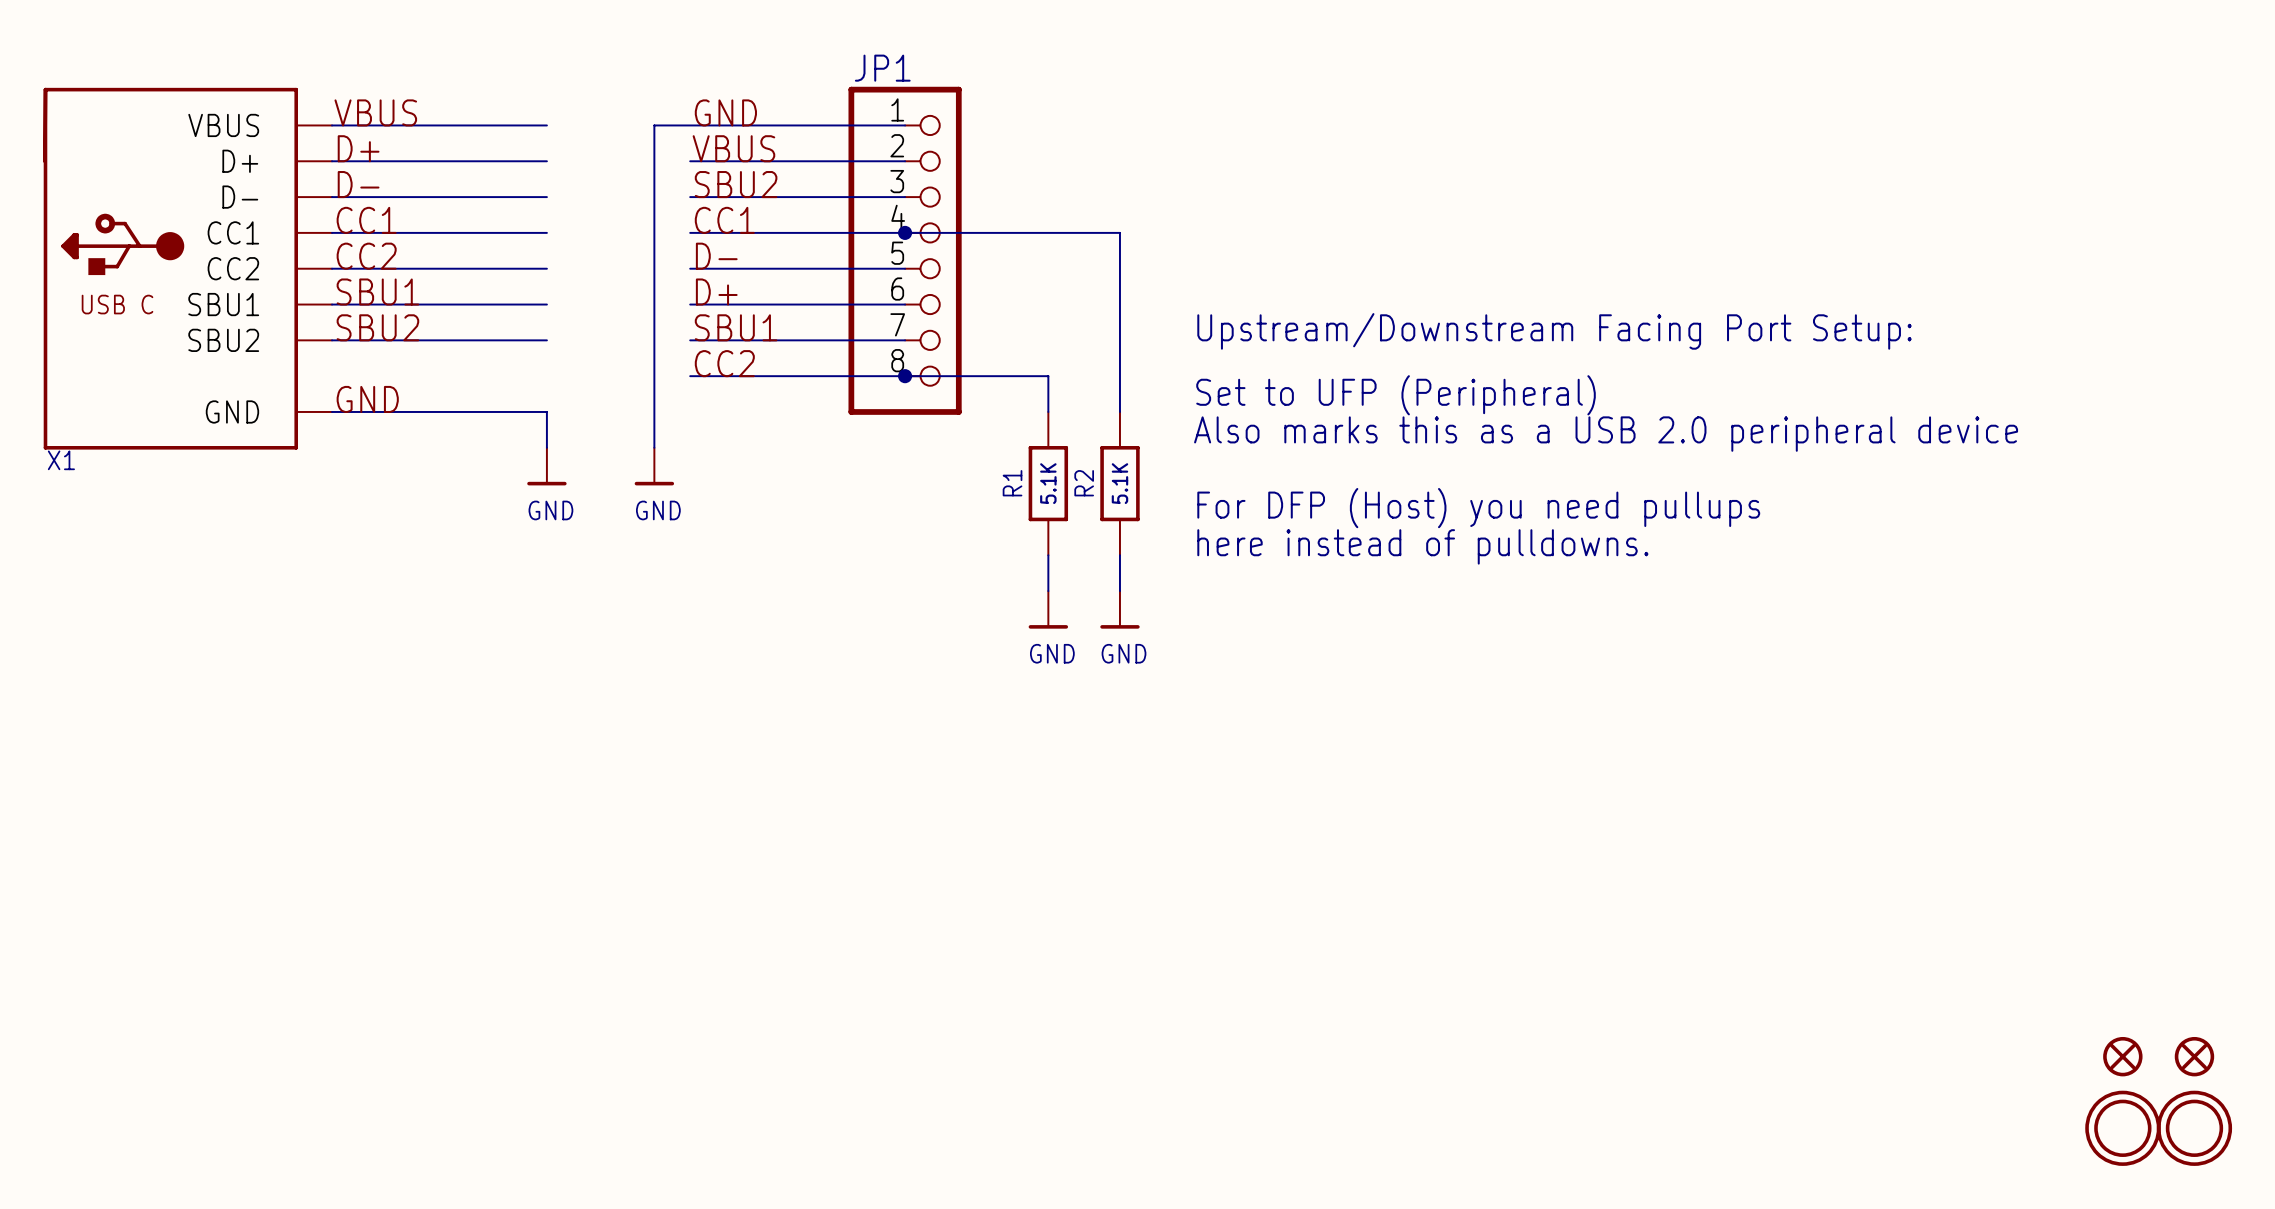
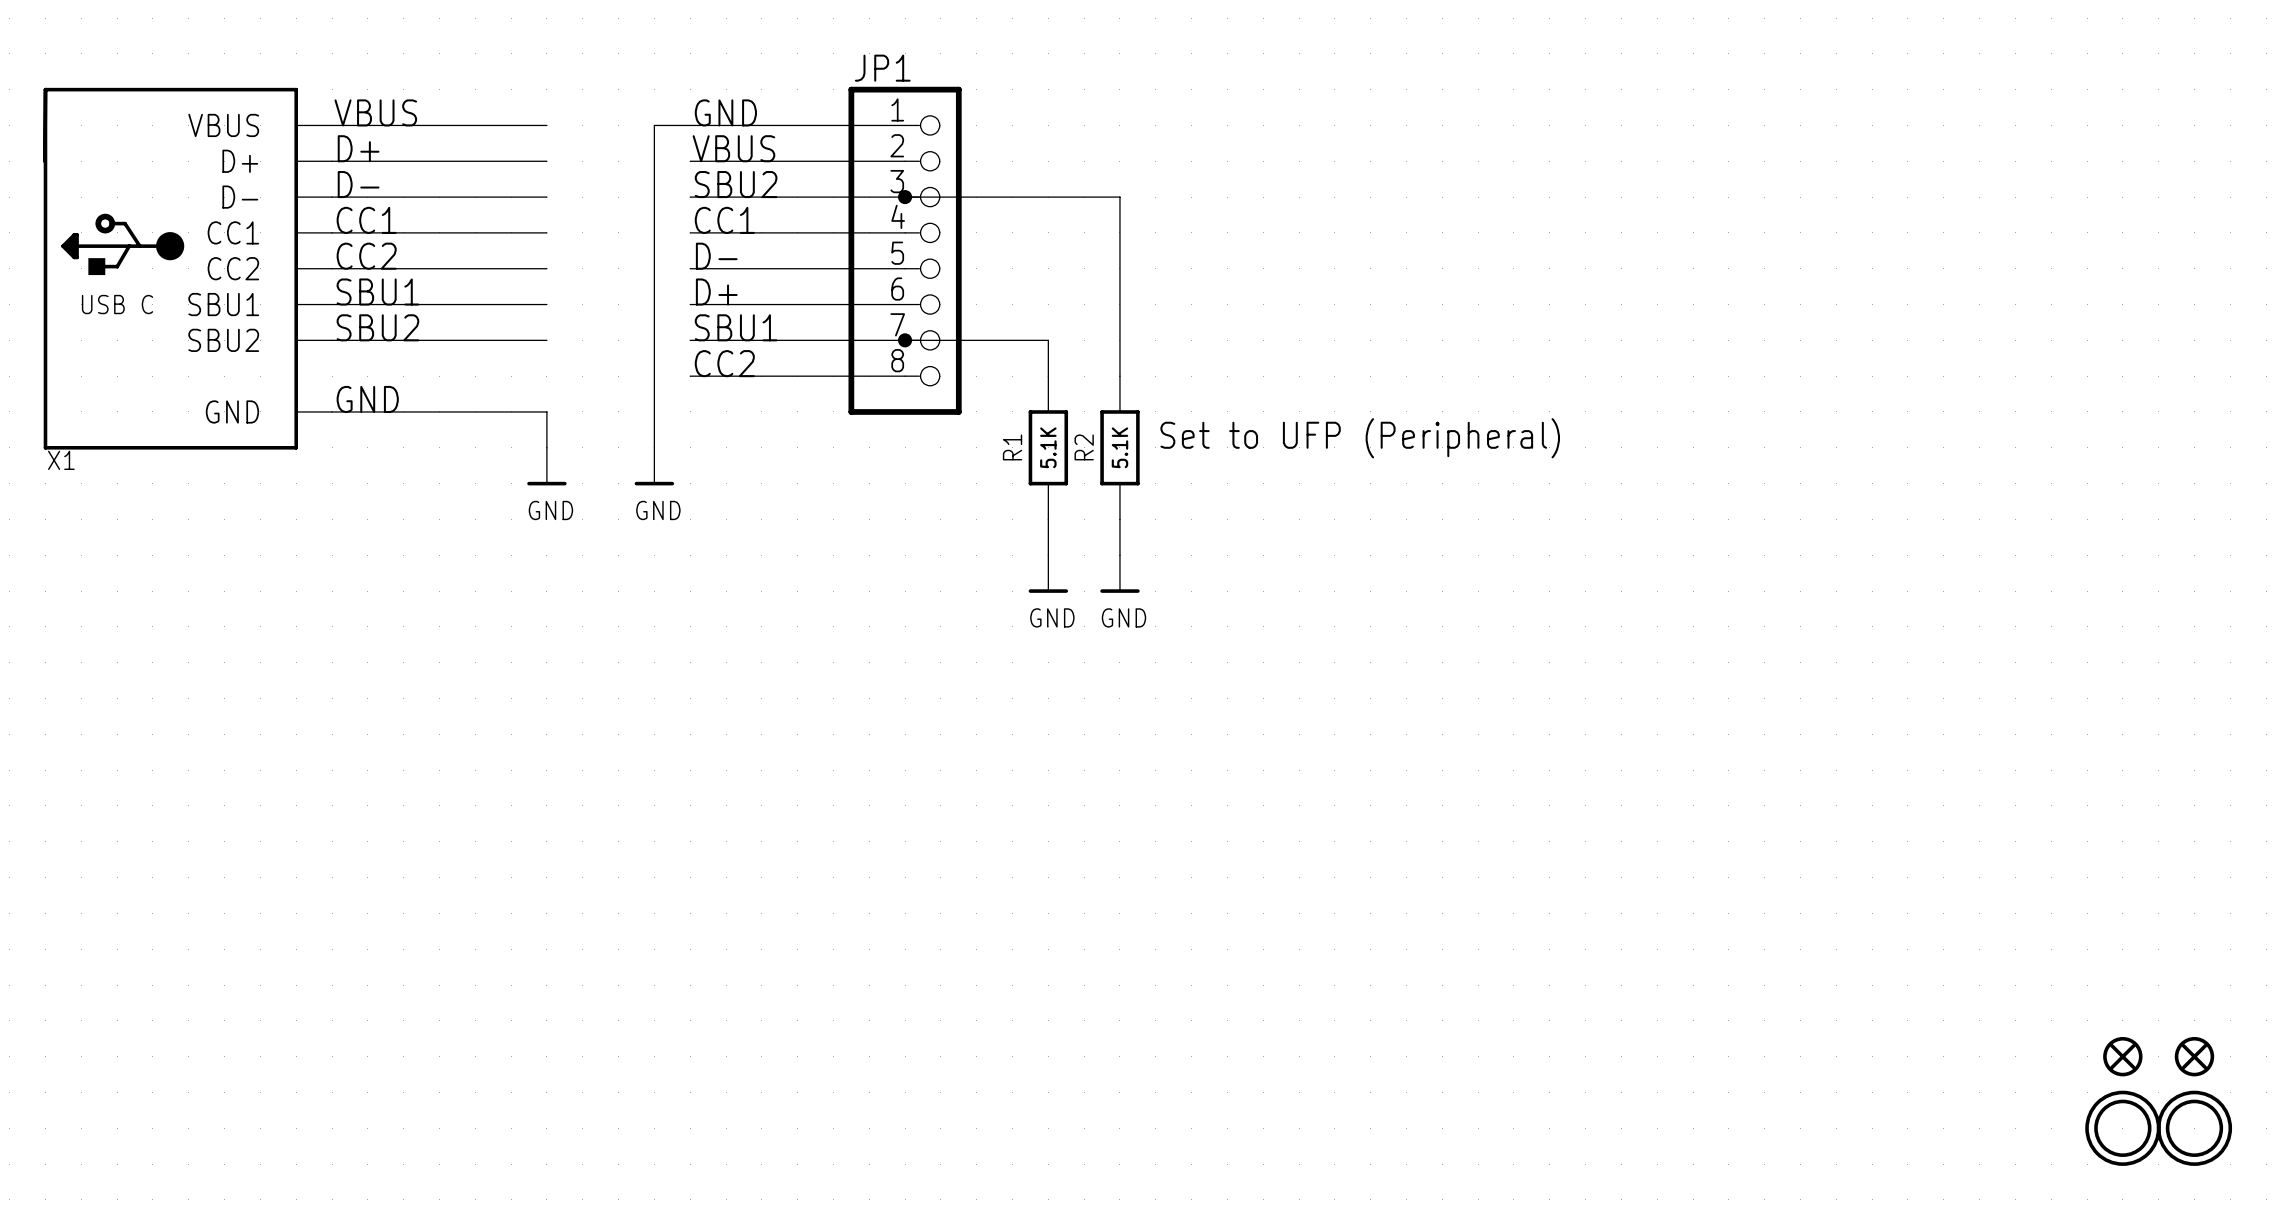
wire: (905, 232) (1119, 232) -> (905, 197) (1119, 197) (1119, 232)
junction position: (905, 232) -> (905, 197)
text: Upstream/Downstream Facing Port Setup: (1554, 331) -> none
wire: (905, 376) (1048, 376) (1048, 411) -> (905, 340) (1048, 340) (1048, 376)
junction position: (905, 376) -> (905, 340)
text position: Set to UFP (Peripheral) (1396, 395) -> Set to UFP (Peripheral) (1360, 438)
text: Also marks this as a USB 2.0 peripheral device (1606, 434) -> none
R1 position: (1048, 483) -> (1048, 447)
R2 position: (1119, 483) -> (1119, 447)
text: For DFP (Host) you need pullups (1478, 508) -> none
text: here instead of pulldowns. (1422, 546) -> none
power symbol position: GND (1048, 609) -> GND (1048, 574)
power symbol position: GND (1119, 609) -> GND (1119, 574)

